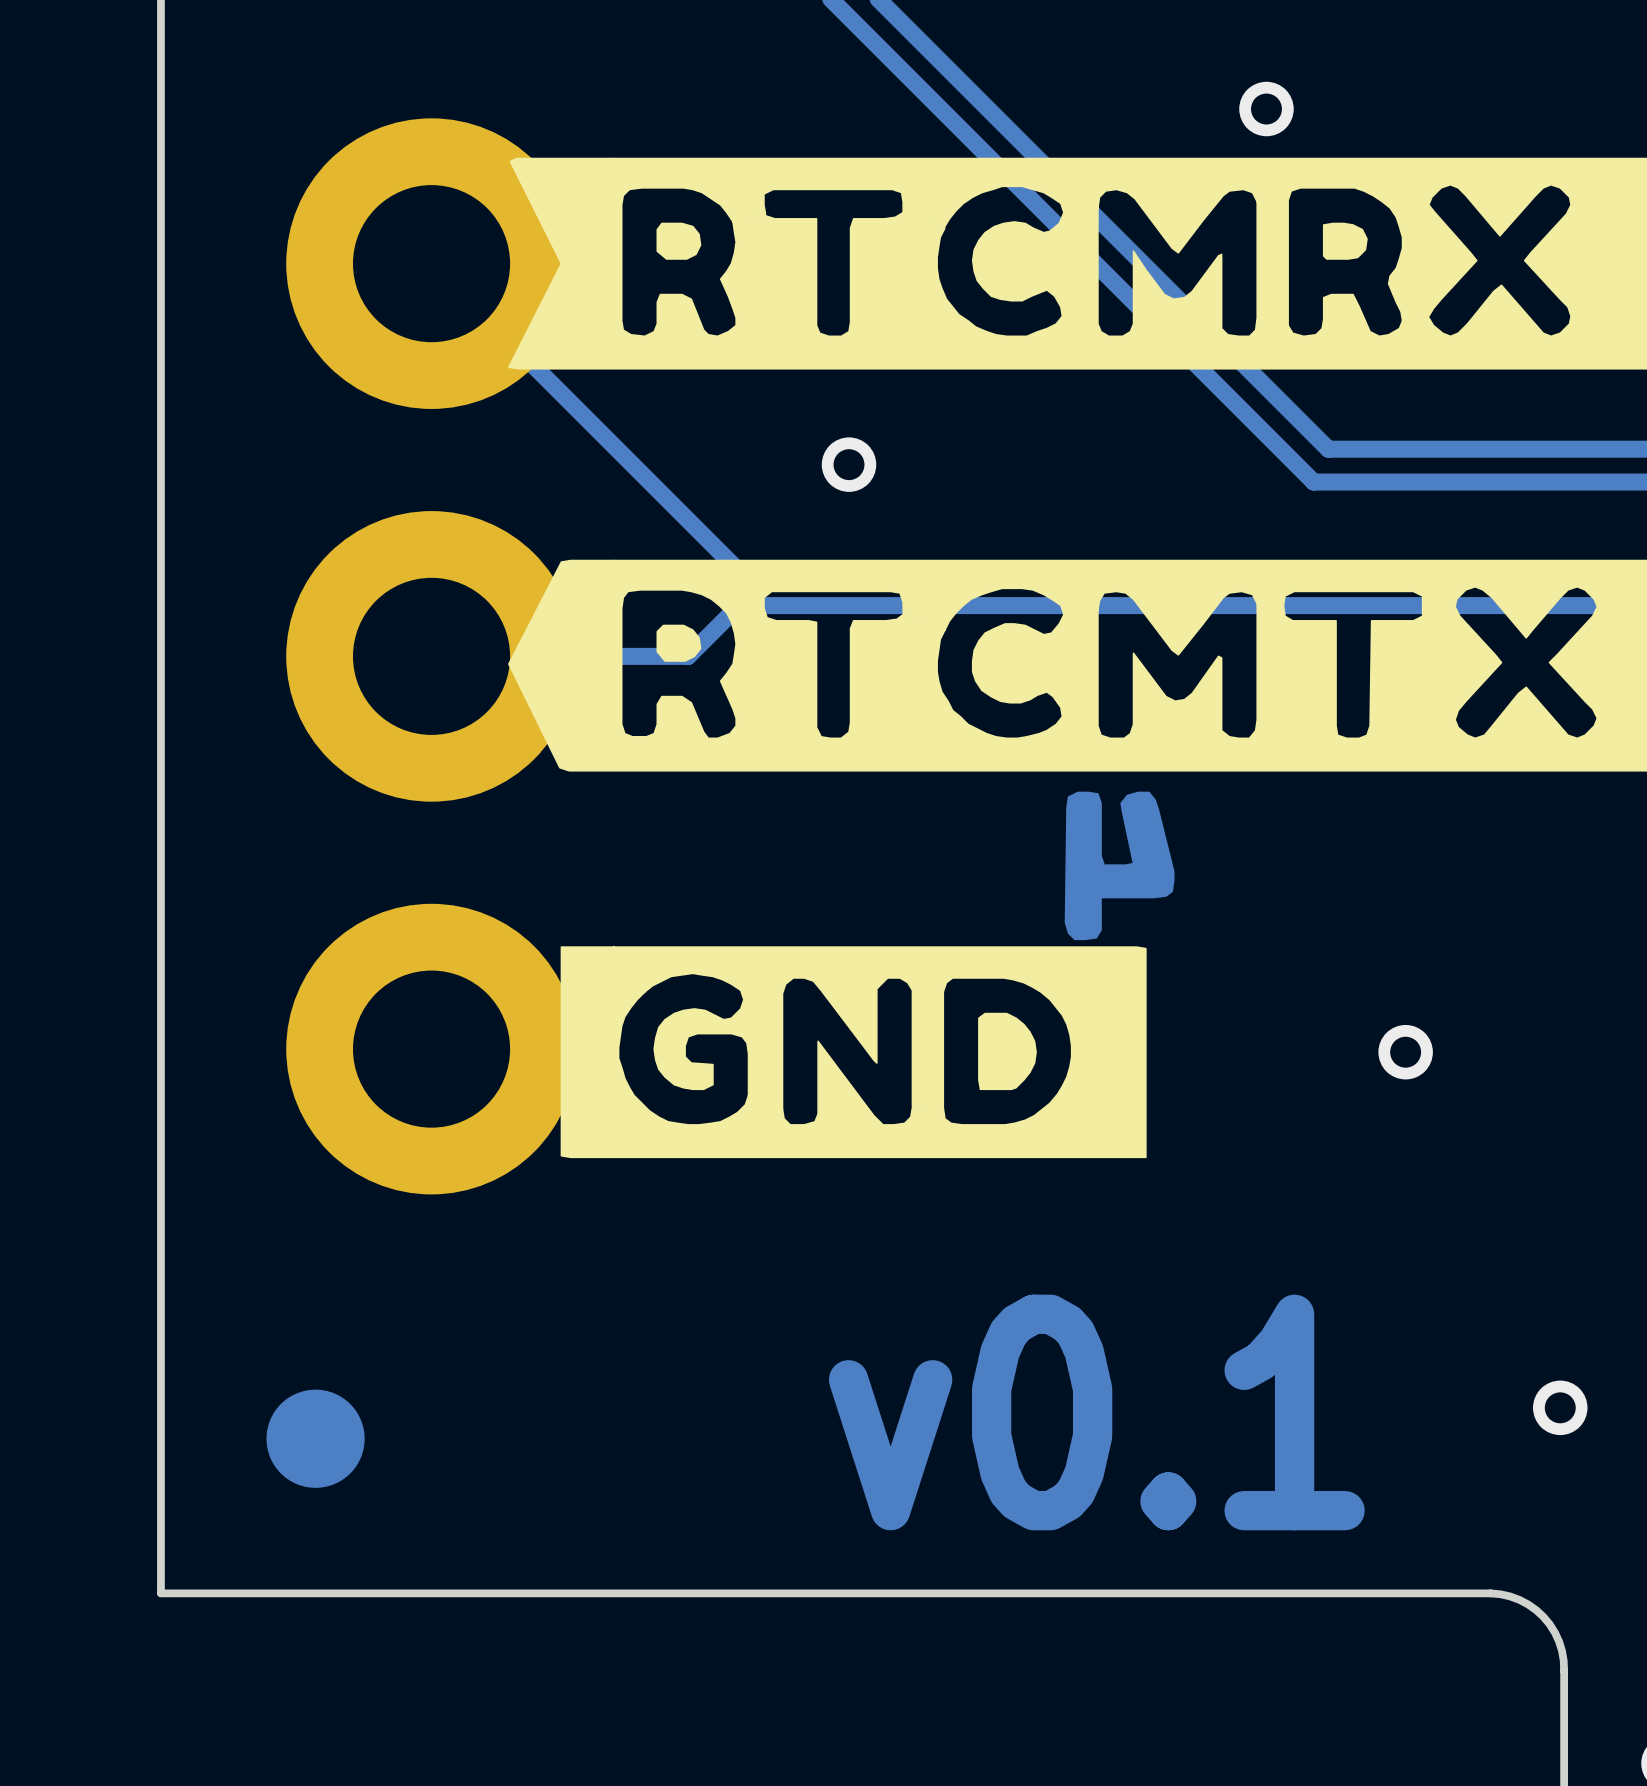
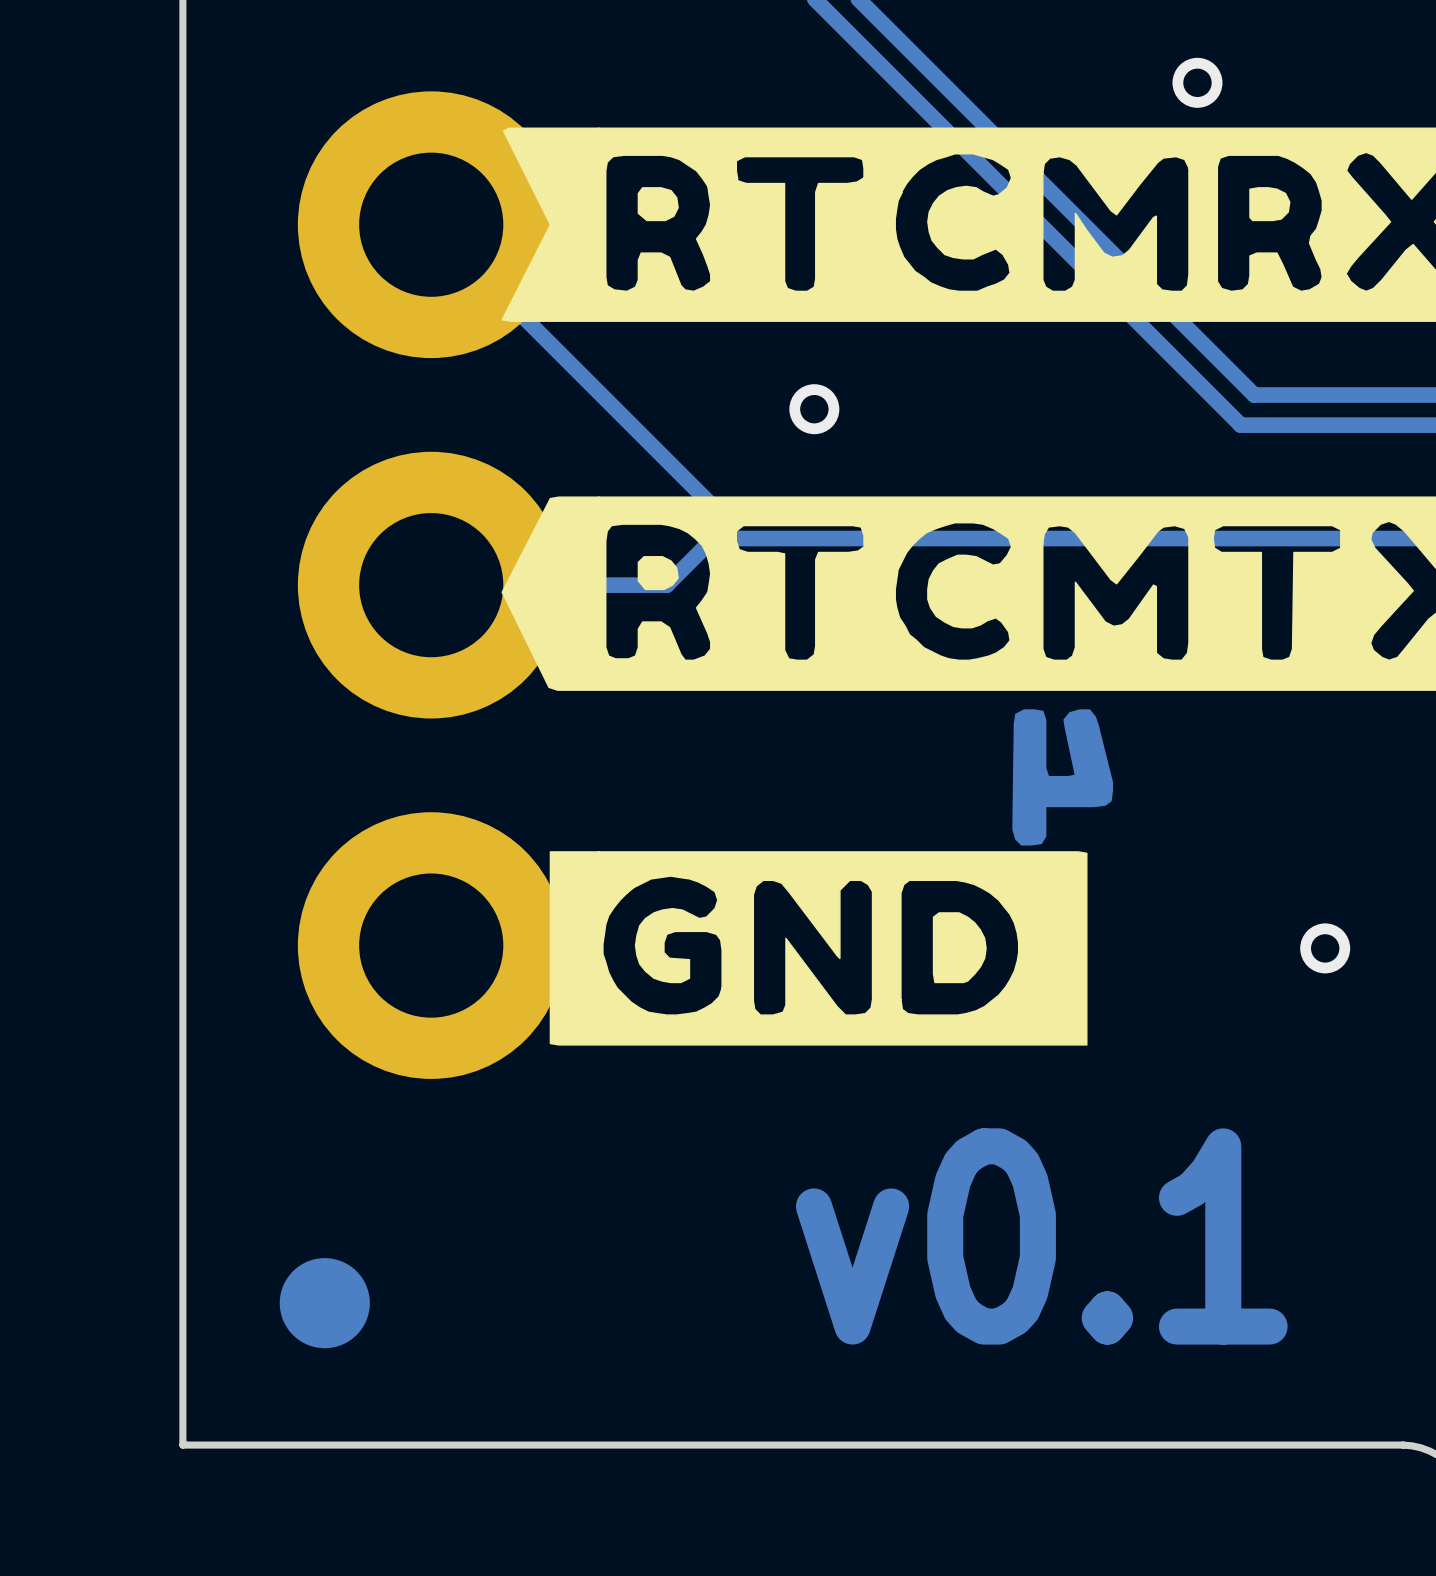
text position: v0.1 (1096, 1412) -> v0.1 (1041, 1236)

